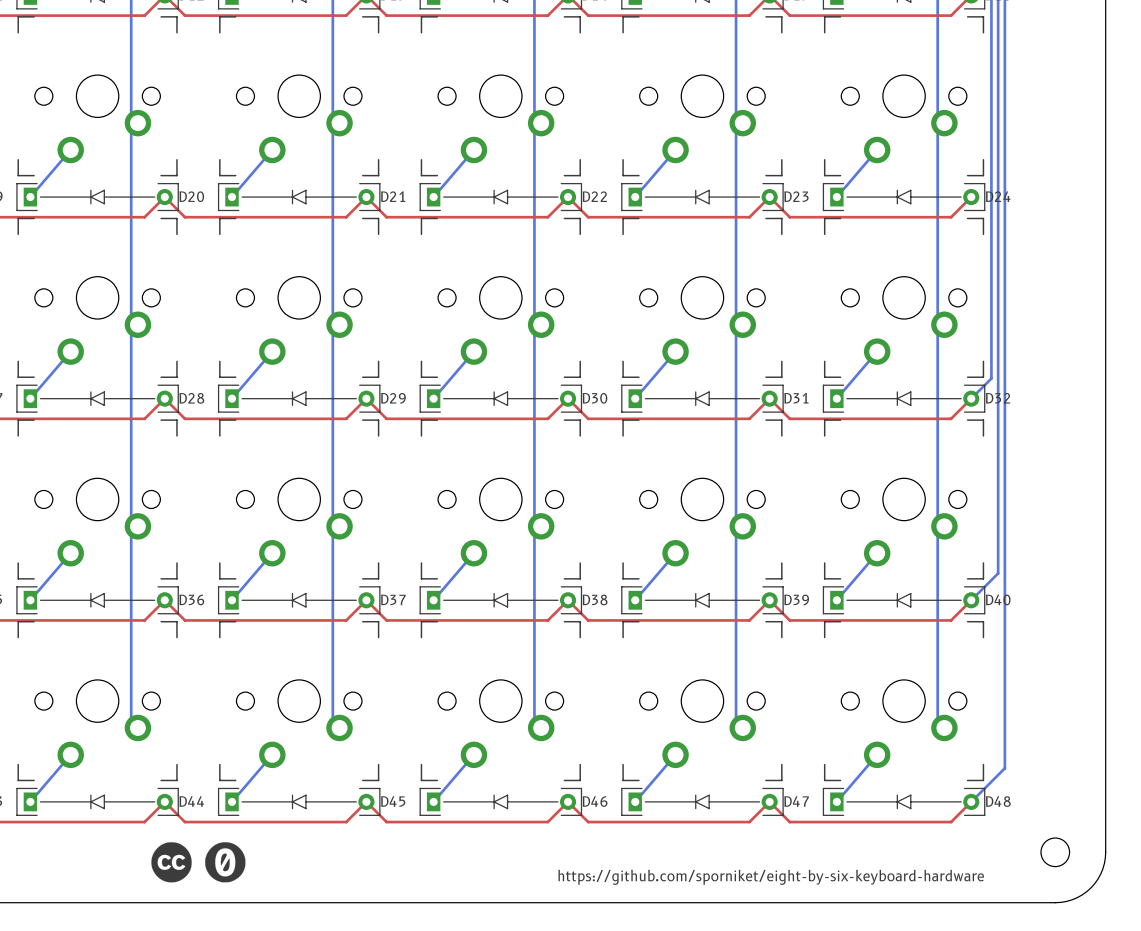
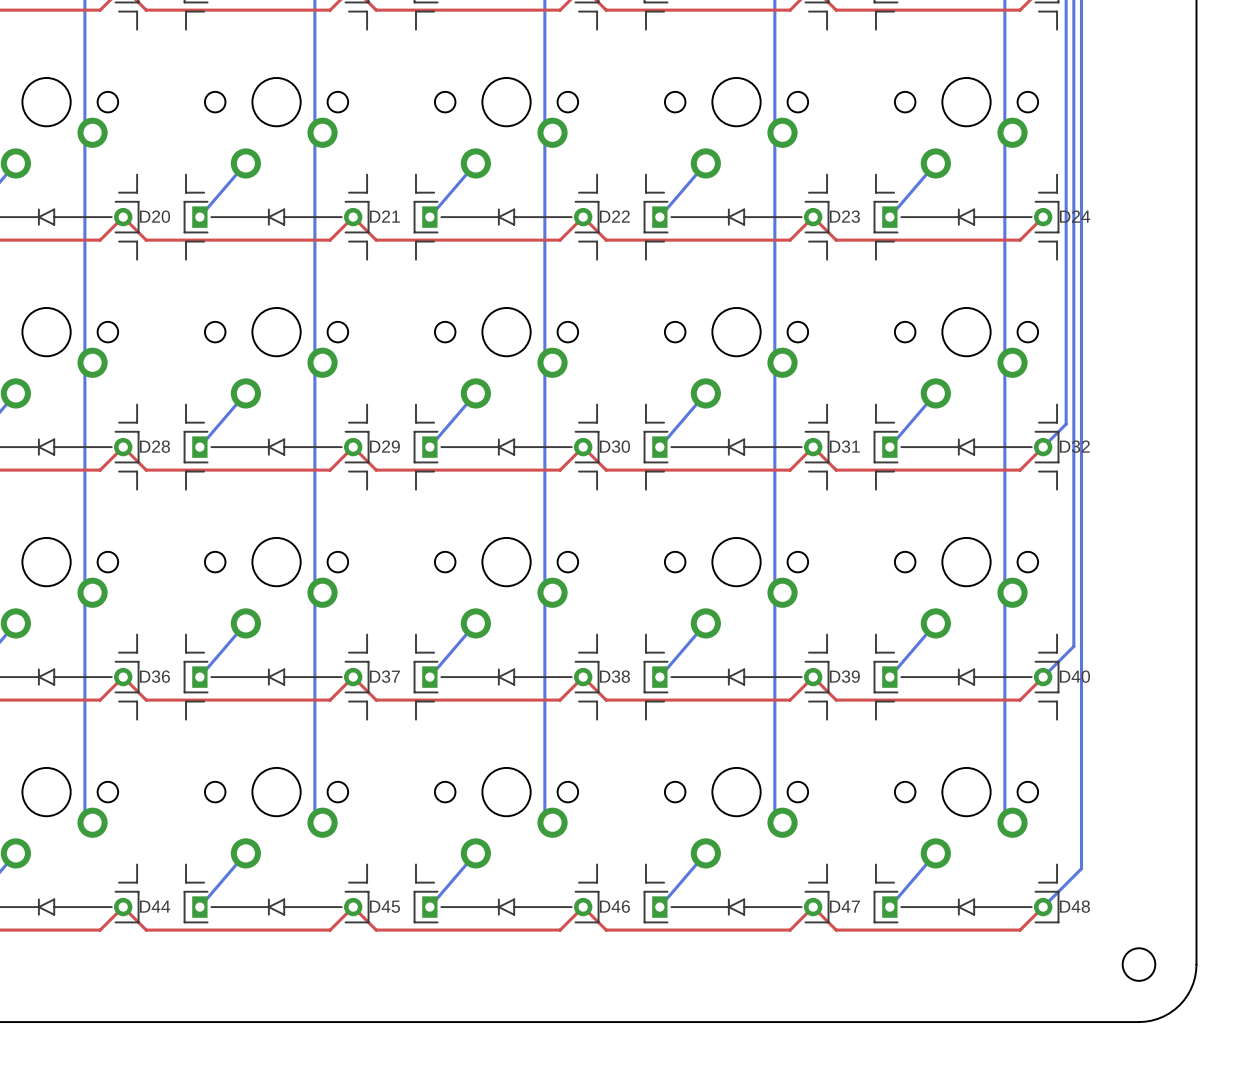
drawing: [151, 842, 192, 883] -> none
drawing: [205, 842, 246, 883] -> none
text: https://github.com/sporniket/eight-by-six-keyboard-hardware (771, 877) -> none

